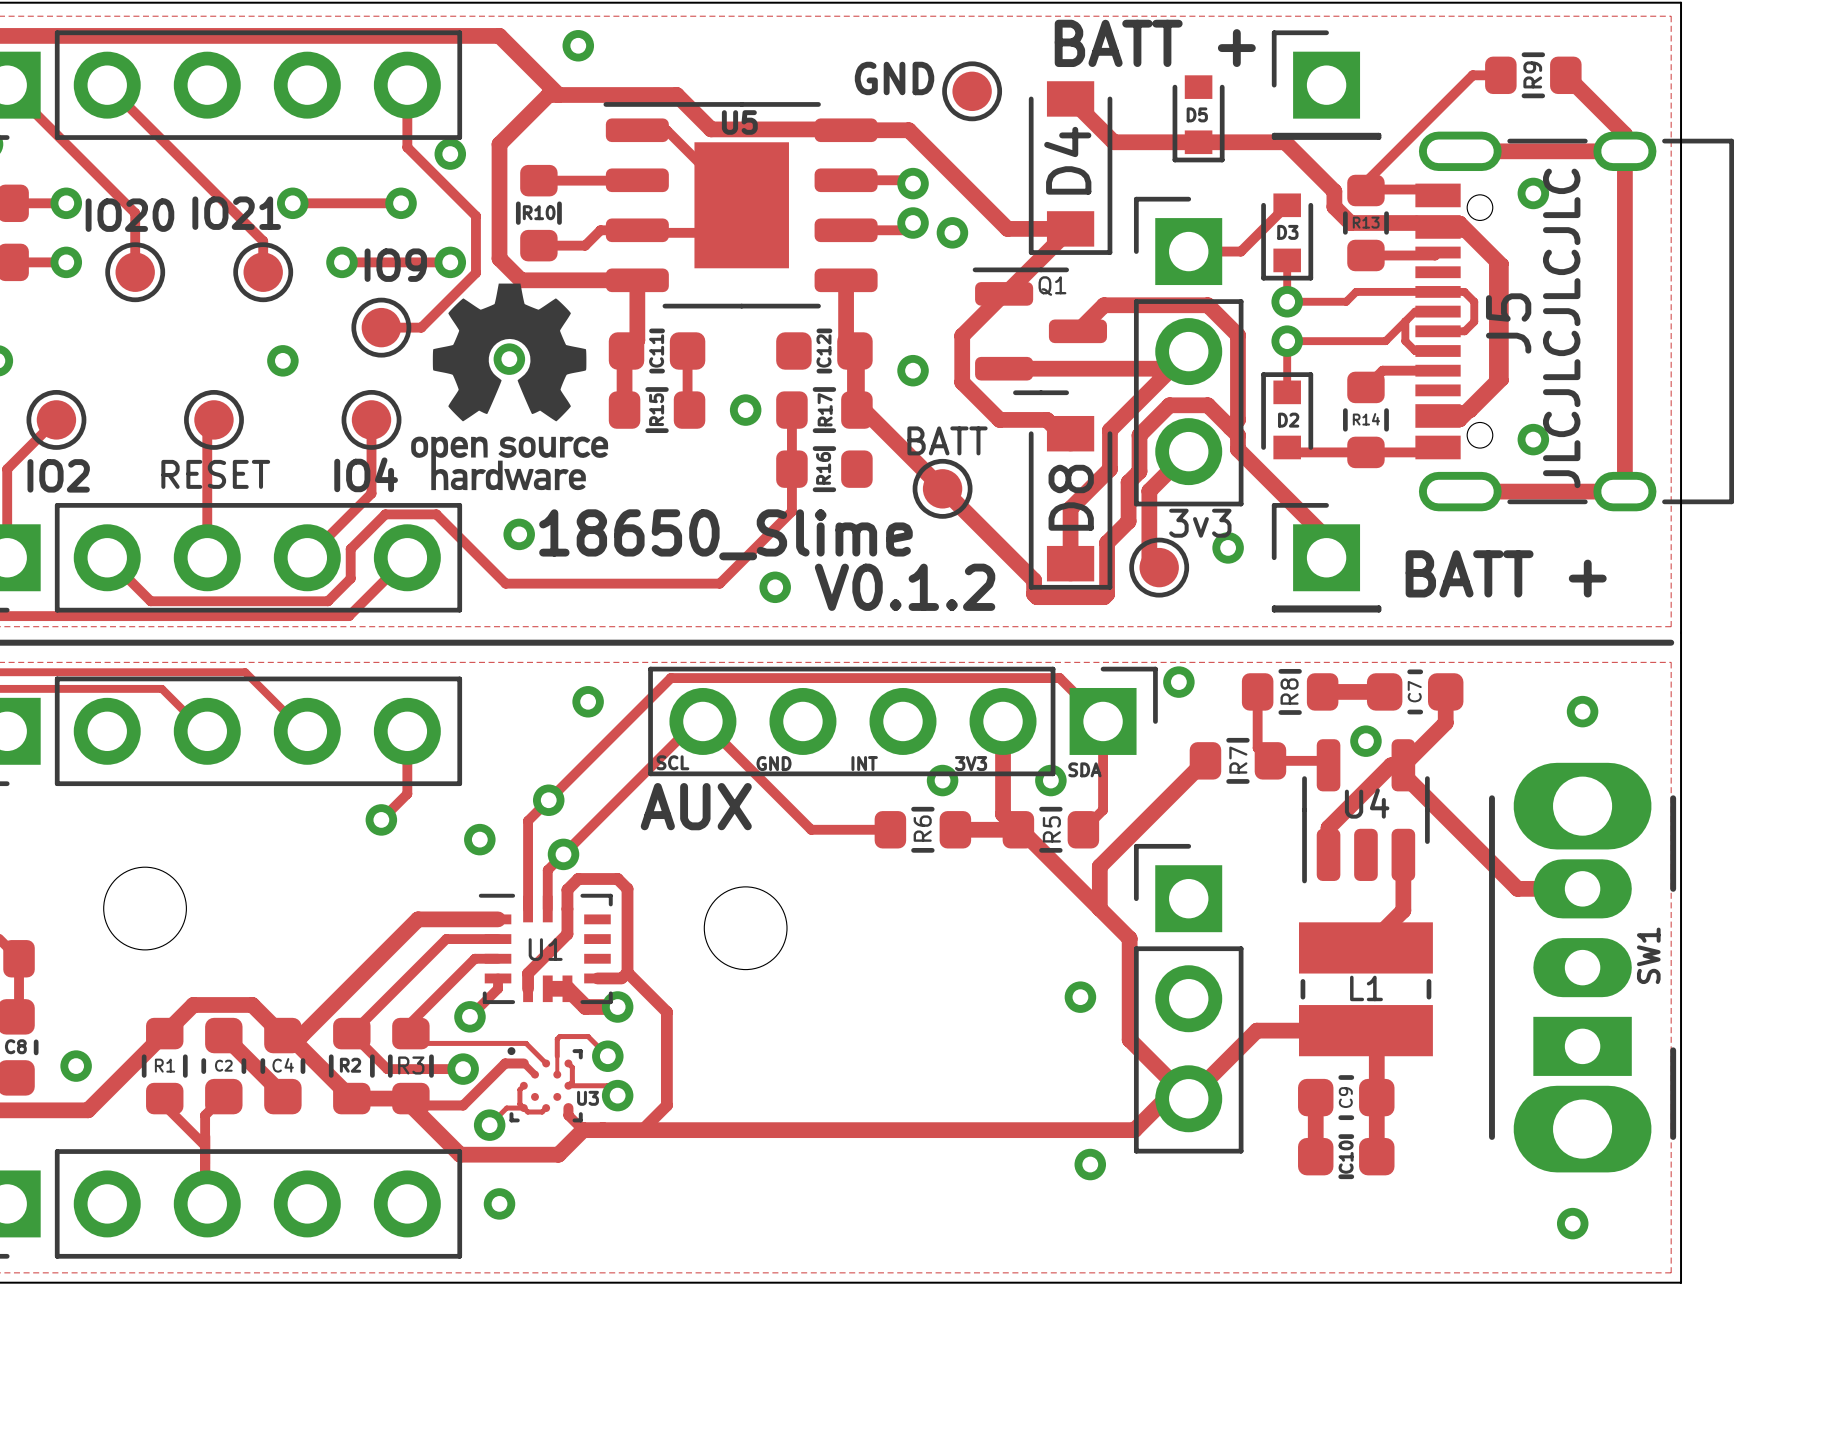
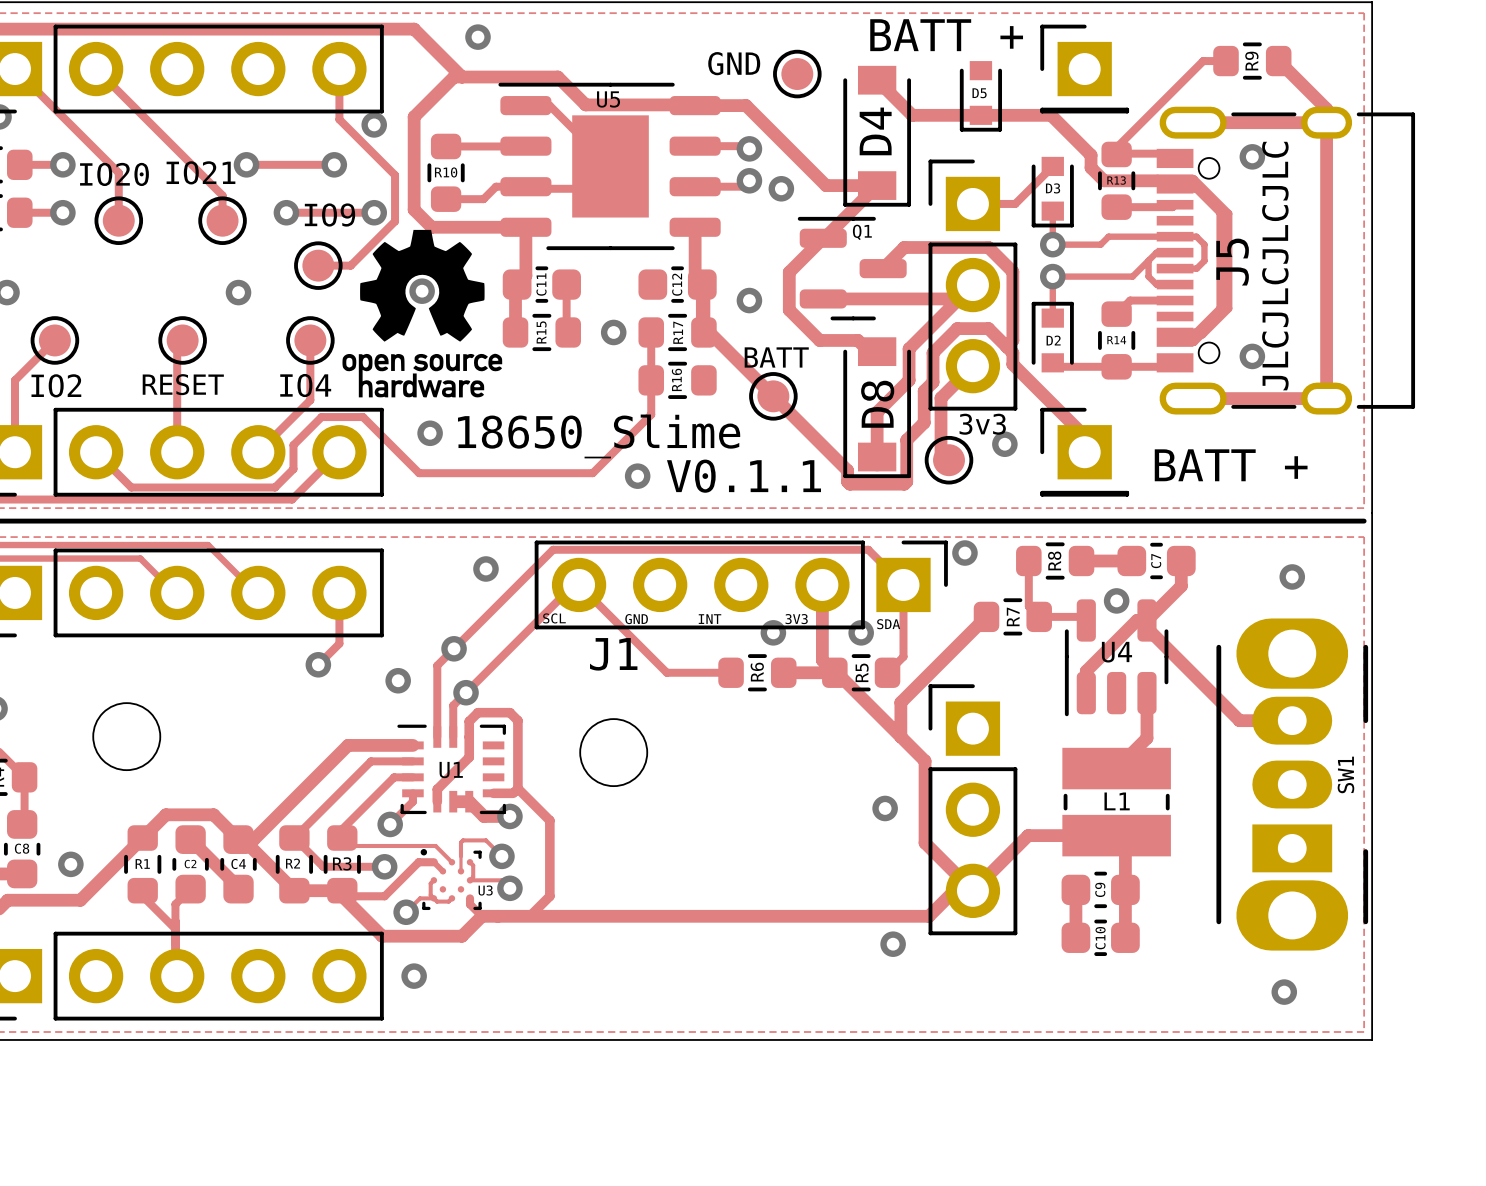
text: V0.1.2 (905, 587) -> V0.1.1 (743, 476)
text: AUX (696, 806) -> none
J1 name: none -> J1 (613, 654)

